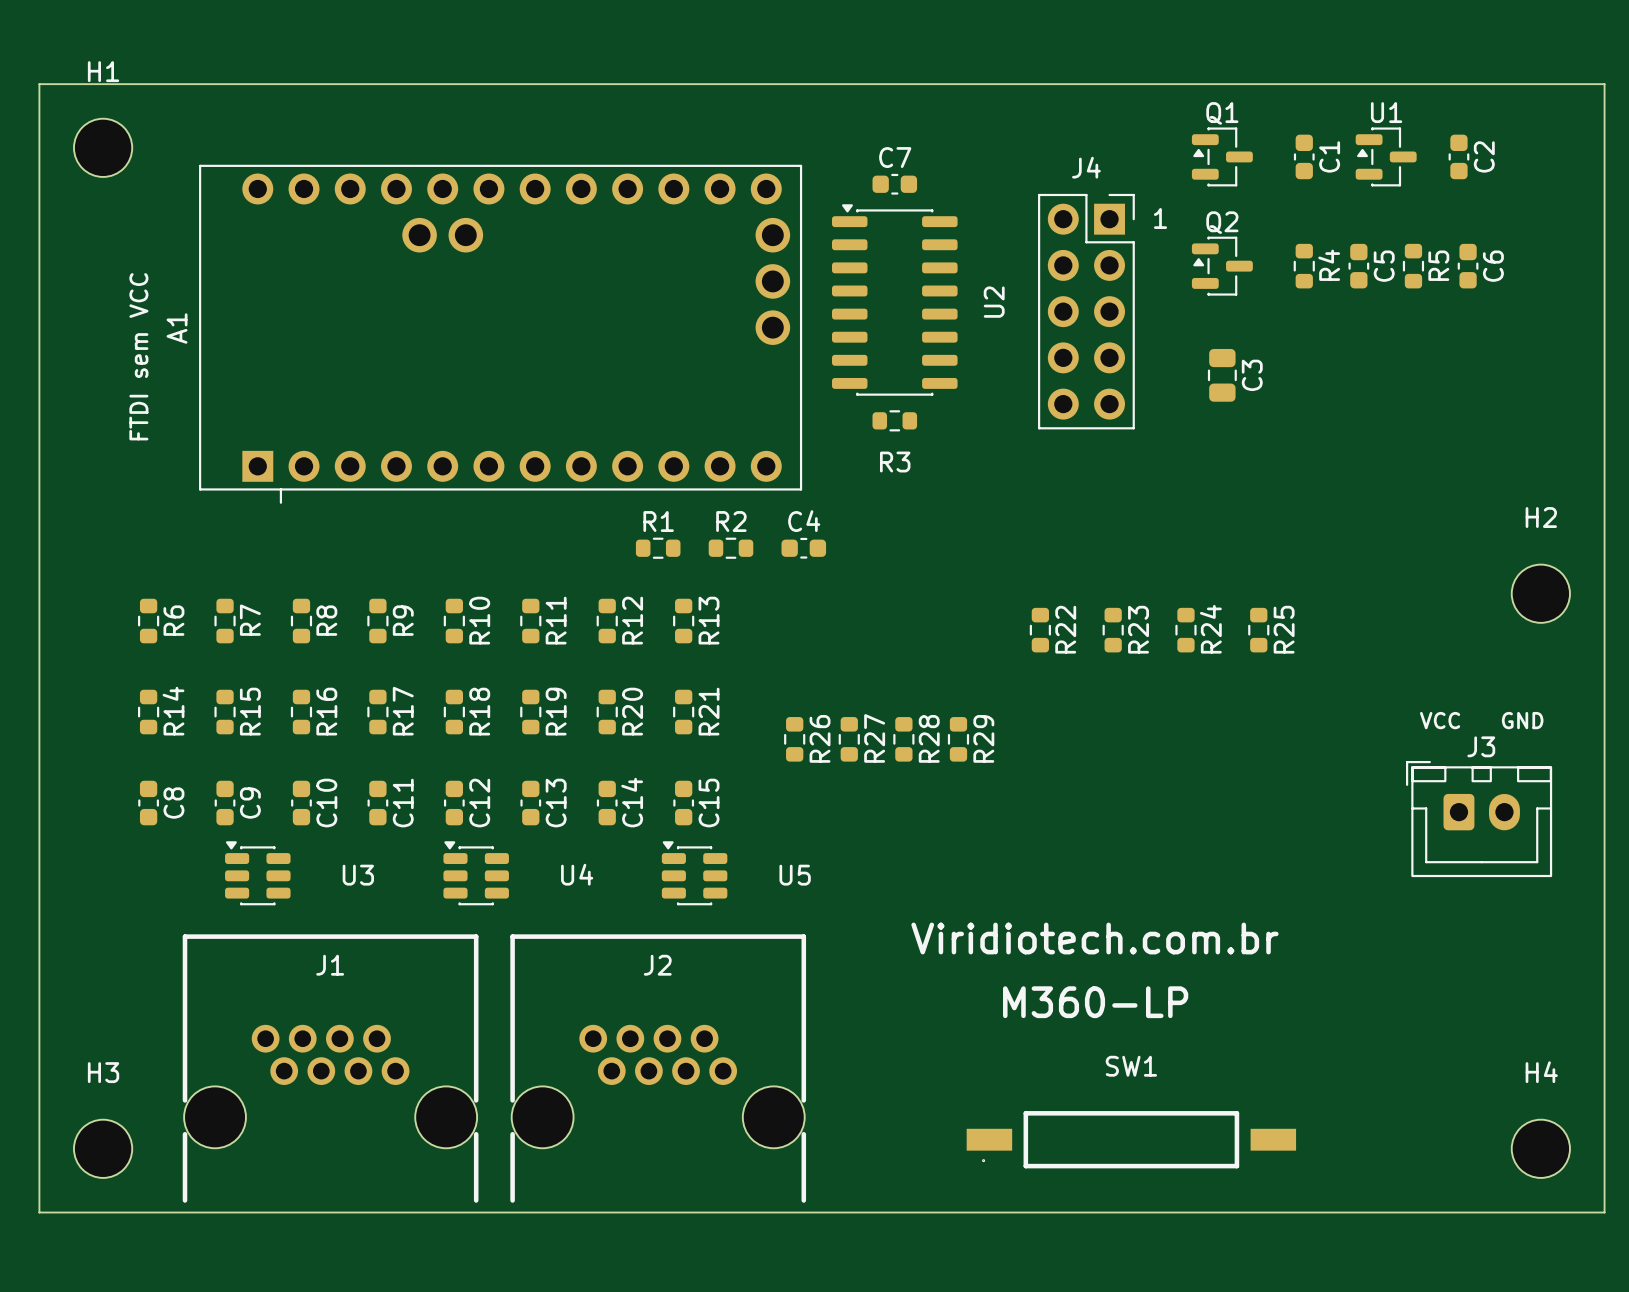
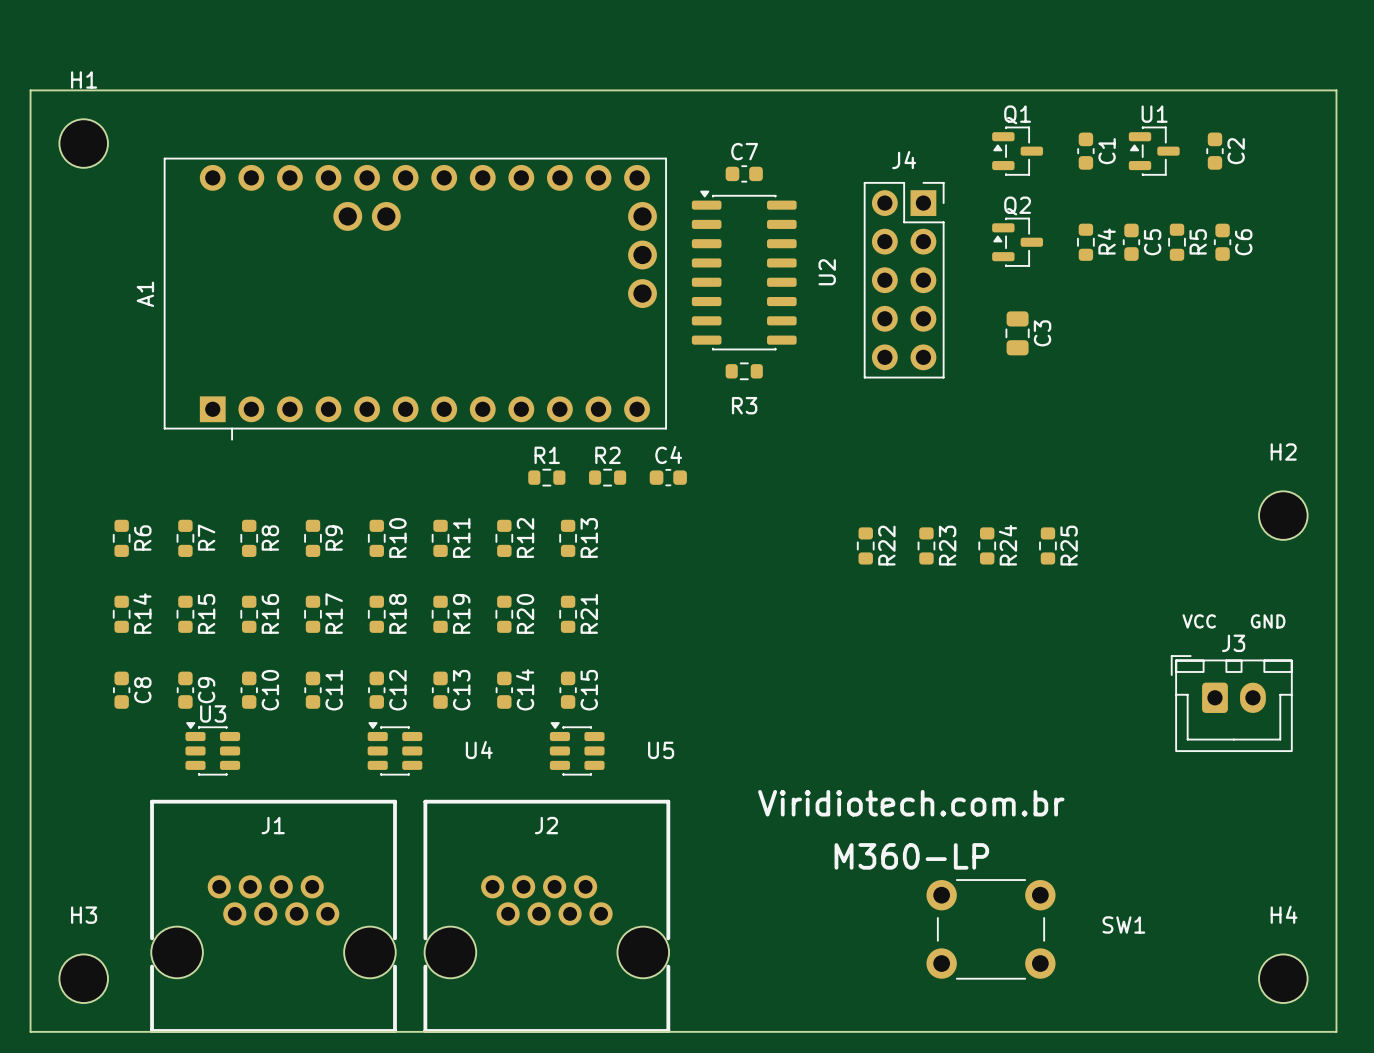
text: 1 (1160, 218) -> none
text: FTDI sem VCC (138, 356) -> none
R26: (794, 739) -> none
R27: (849, 739) -> none
R28: (903, 739) -> none
R29: (958, 739) -> none
U3 name position: U3 (358, 875) -> U3 (213, 713)
J1 footprint: [182, 934, 479, 1203] -> [150, 799, 397, 1033]
J2 footprint: [510, 934, 807, 1203] -> [423, 799, 671, 1033]
SW1 name position: SW1 (1131, 1066) -> SW1 (1123, 925)
SW1 footprint: [966, 1111, 1297, 1169] -> [926, 879, 1056, 980]

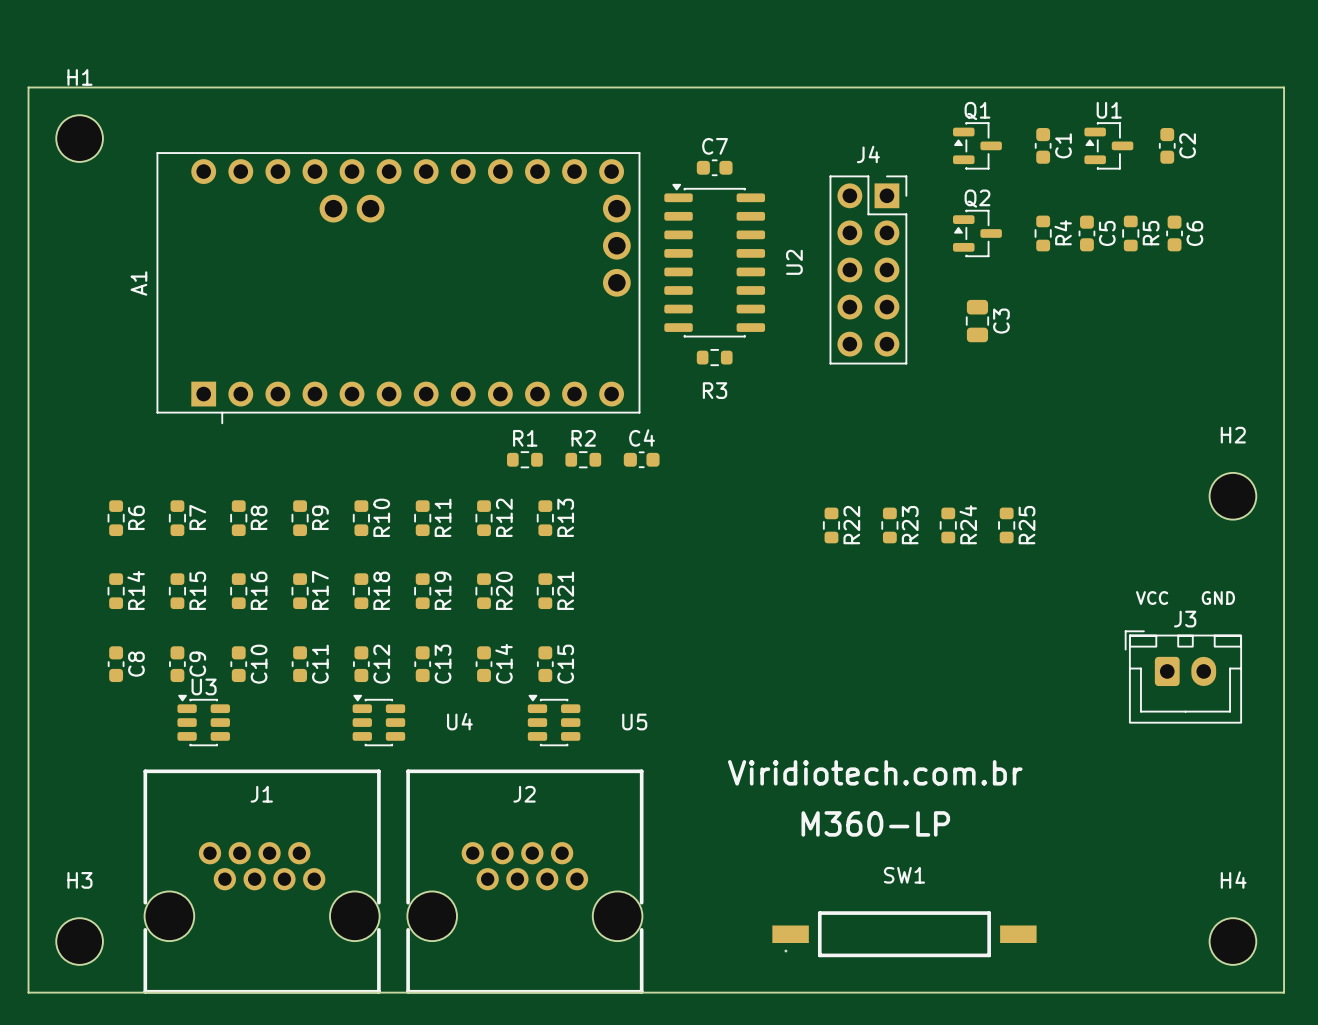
SW1 footprint: [926, 879, 1056, 980] -> [772, 911, 1037, 958]
SW1 name position: SW1 (1123, 925) -> SW1 (904, 875)

